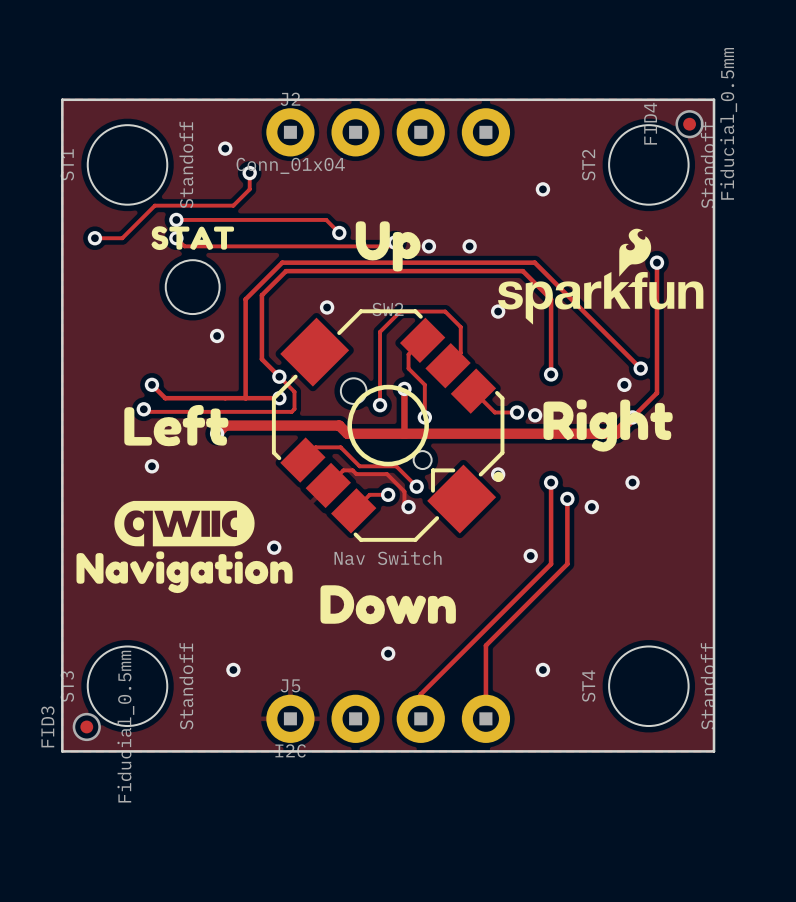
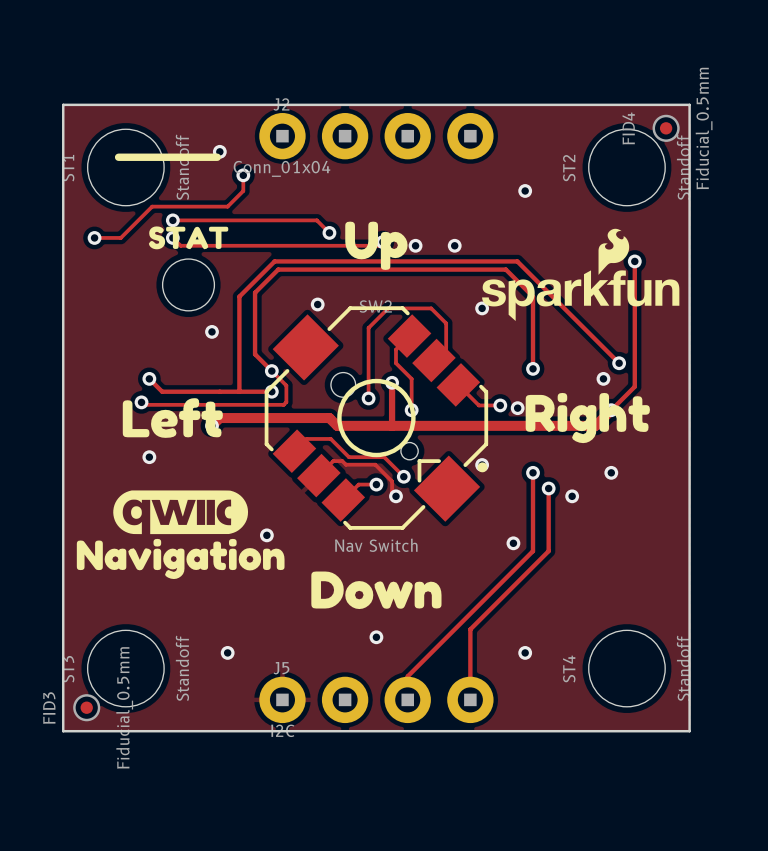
line: none -> (118, 157) (217, 157)

